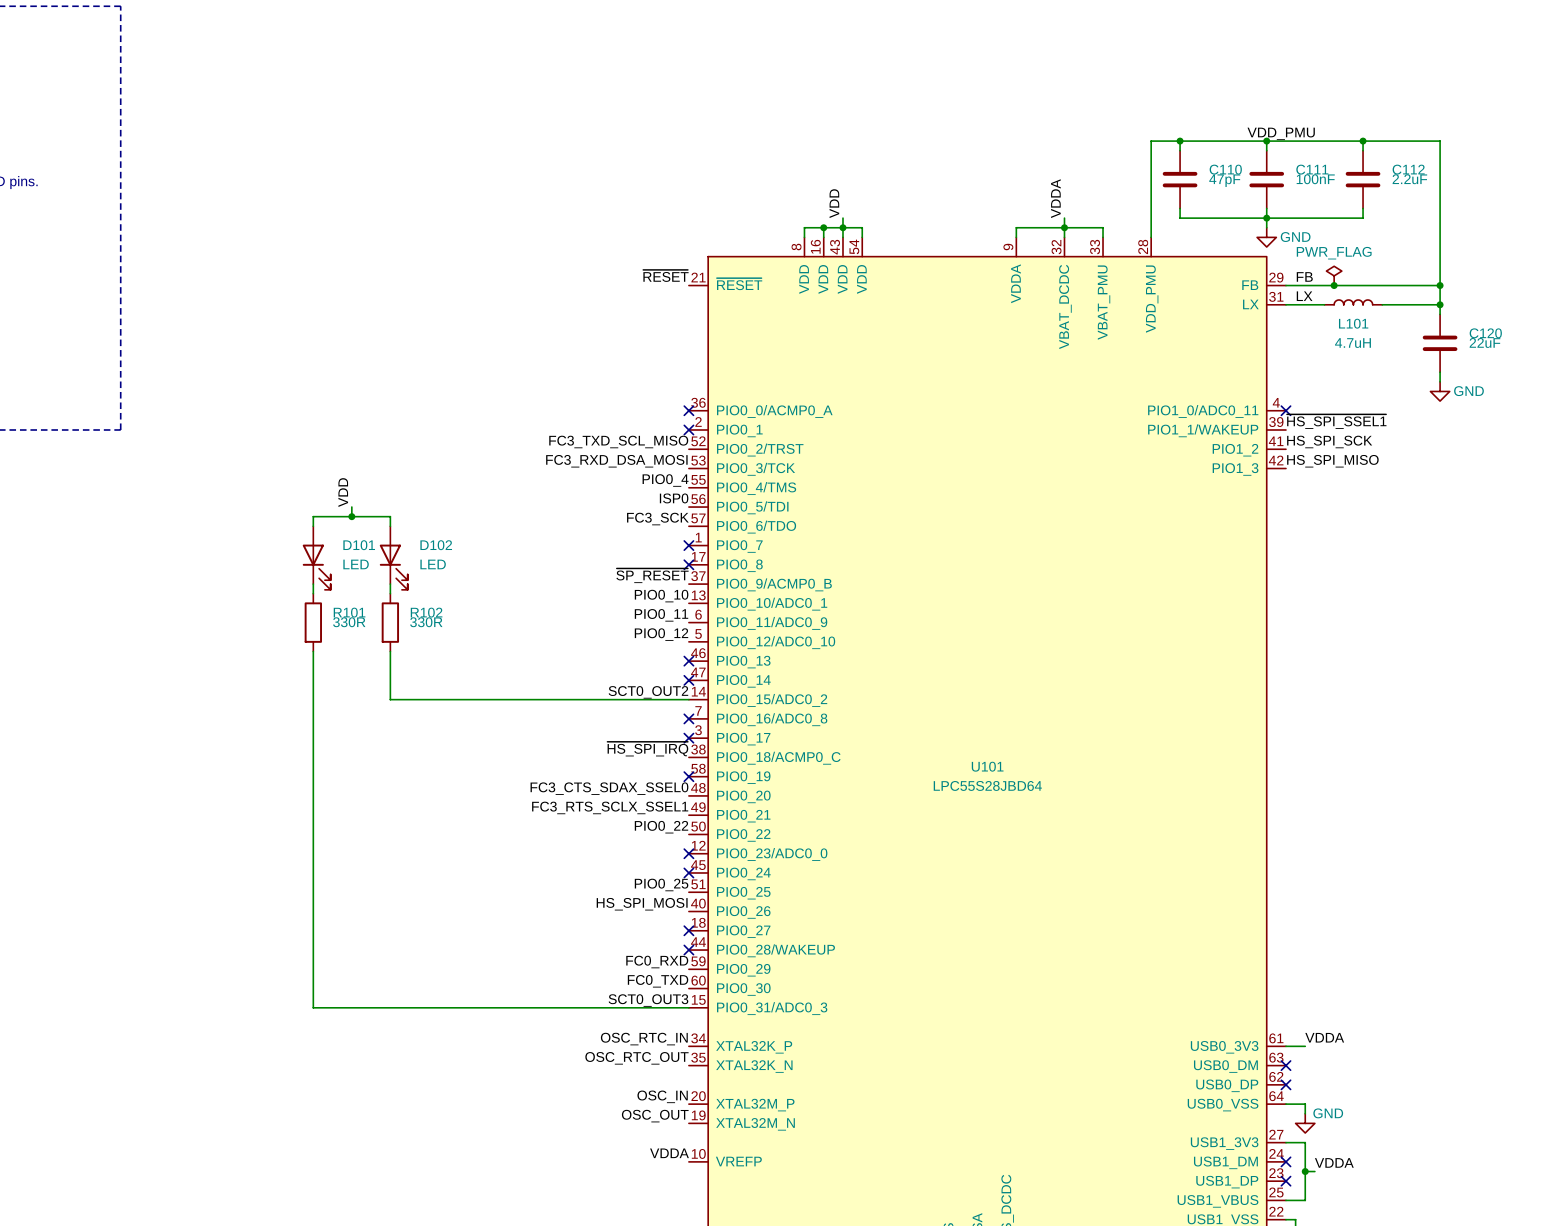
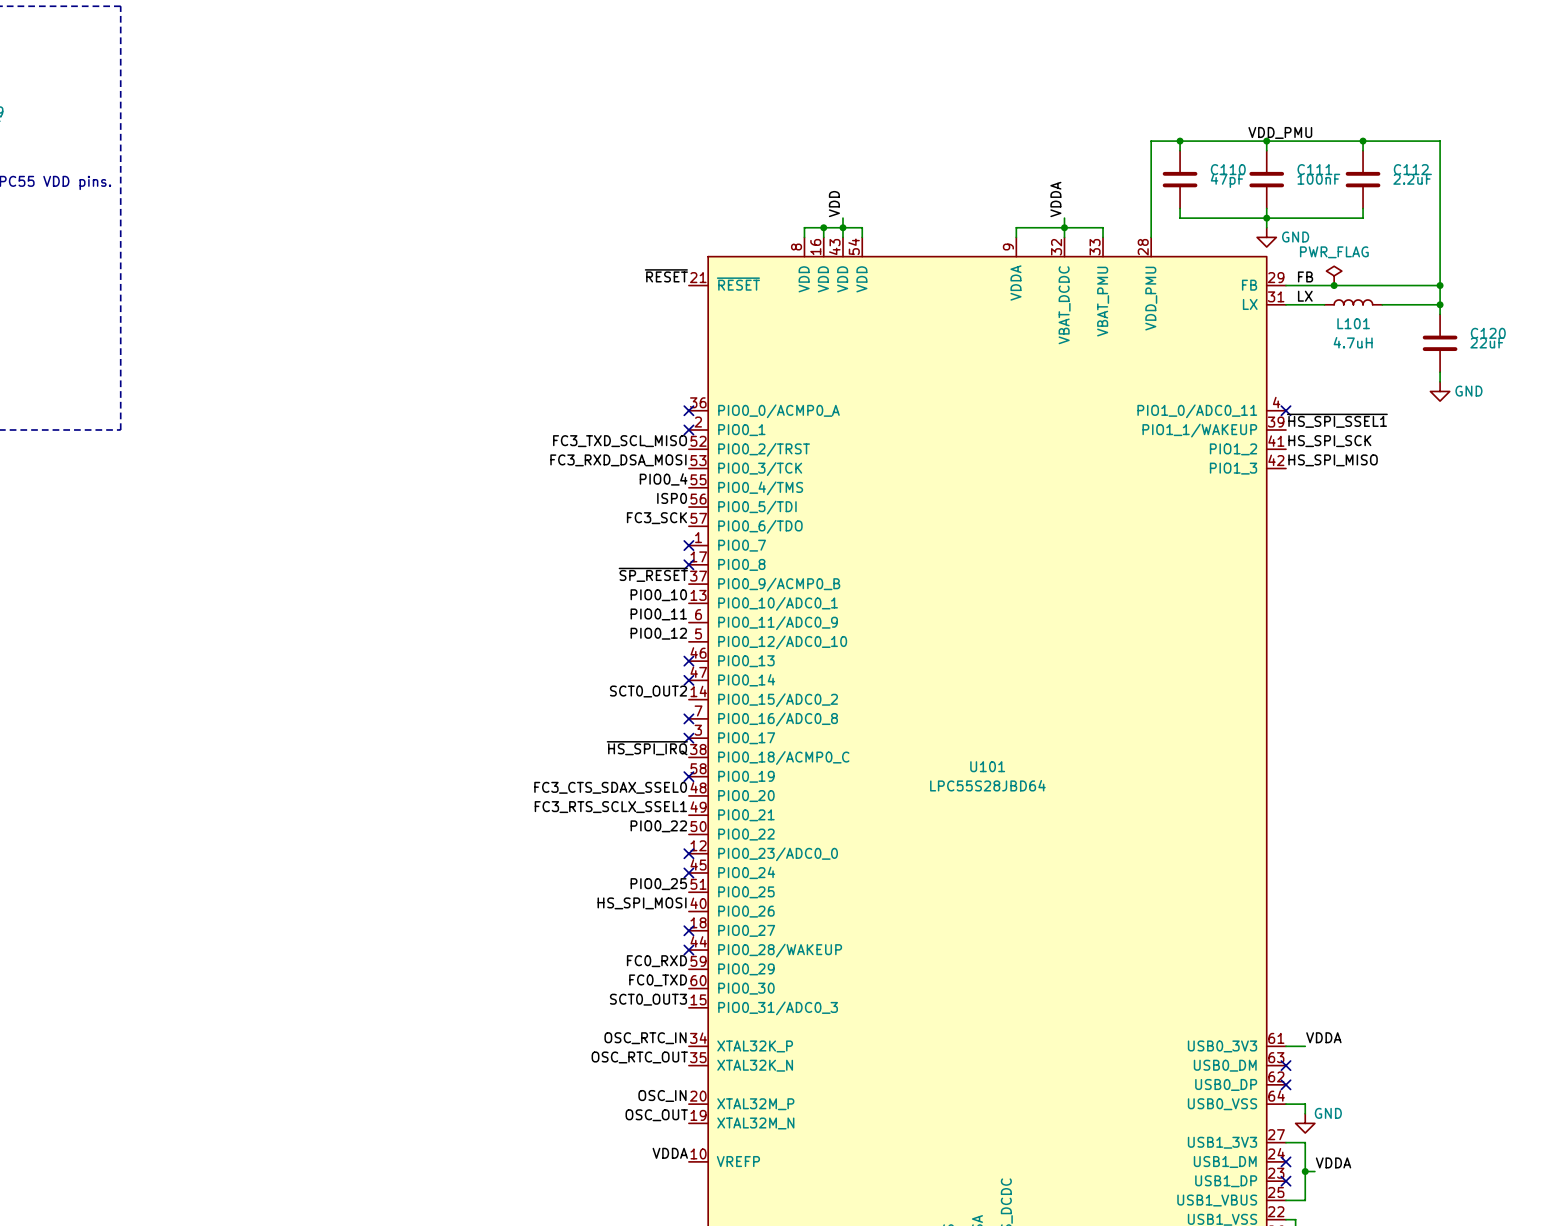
label: VDD (343, 492) -> none
wire: (351, 507) (351, 516) -> none
junction: (351, 516) -> none
wire: (313, 526) (313, 516) (390, 516) (390, 526) -> none
D101: LED (316, 558) -> none
D102: LED (393, 558) -> none
wire: (313, 584) (313, 593) -> none
wire: (390, 584) (390, 593) -> none
R101: 330R (313, 622) -> none
R102: 330R (390, 622) -> none
wire: (313, 651) (313, 1007) (688, 1007) -> none
wire: (390, 651) (390, 699) (688, 699) -> none

